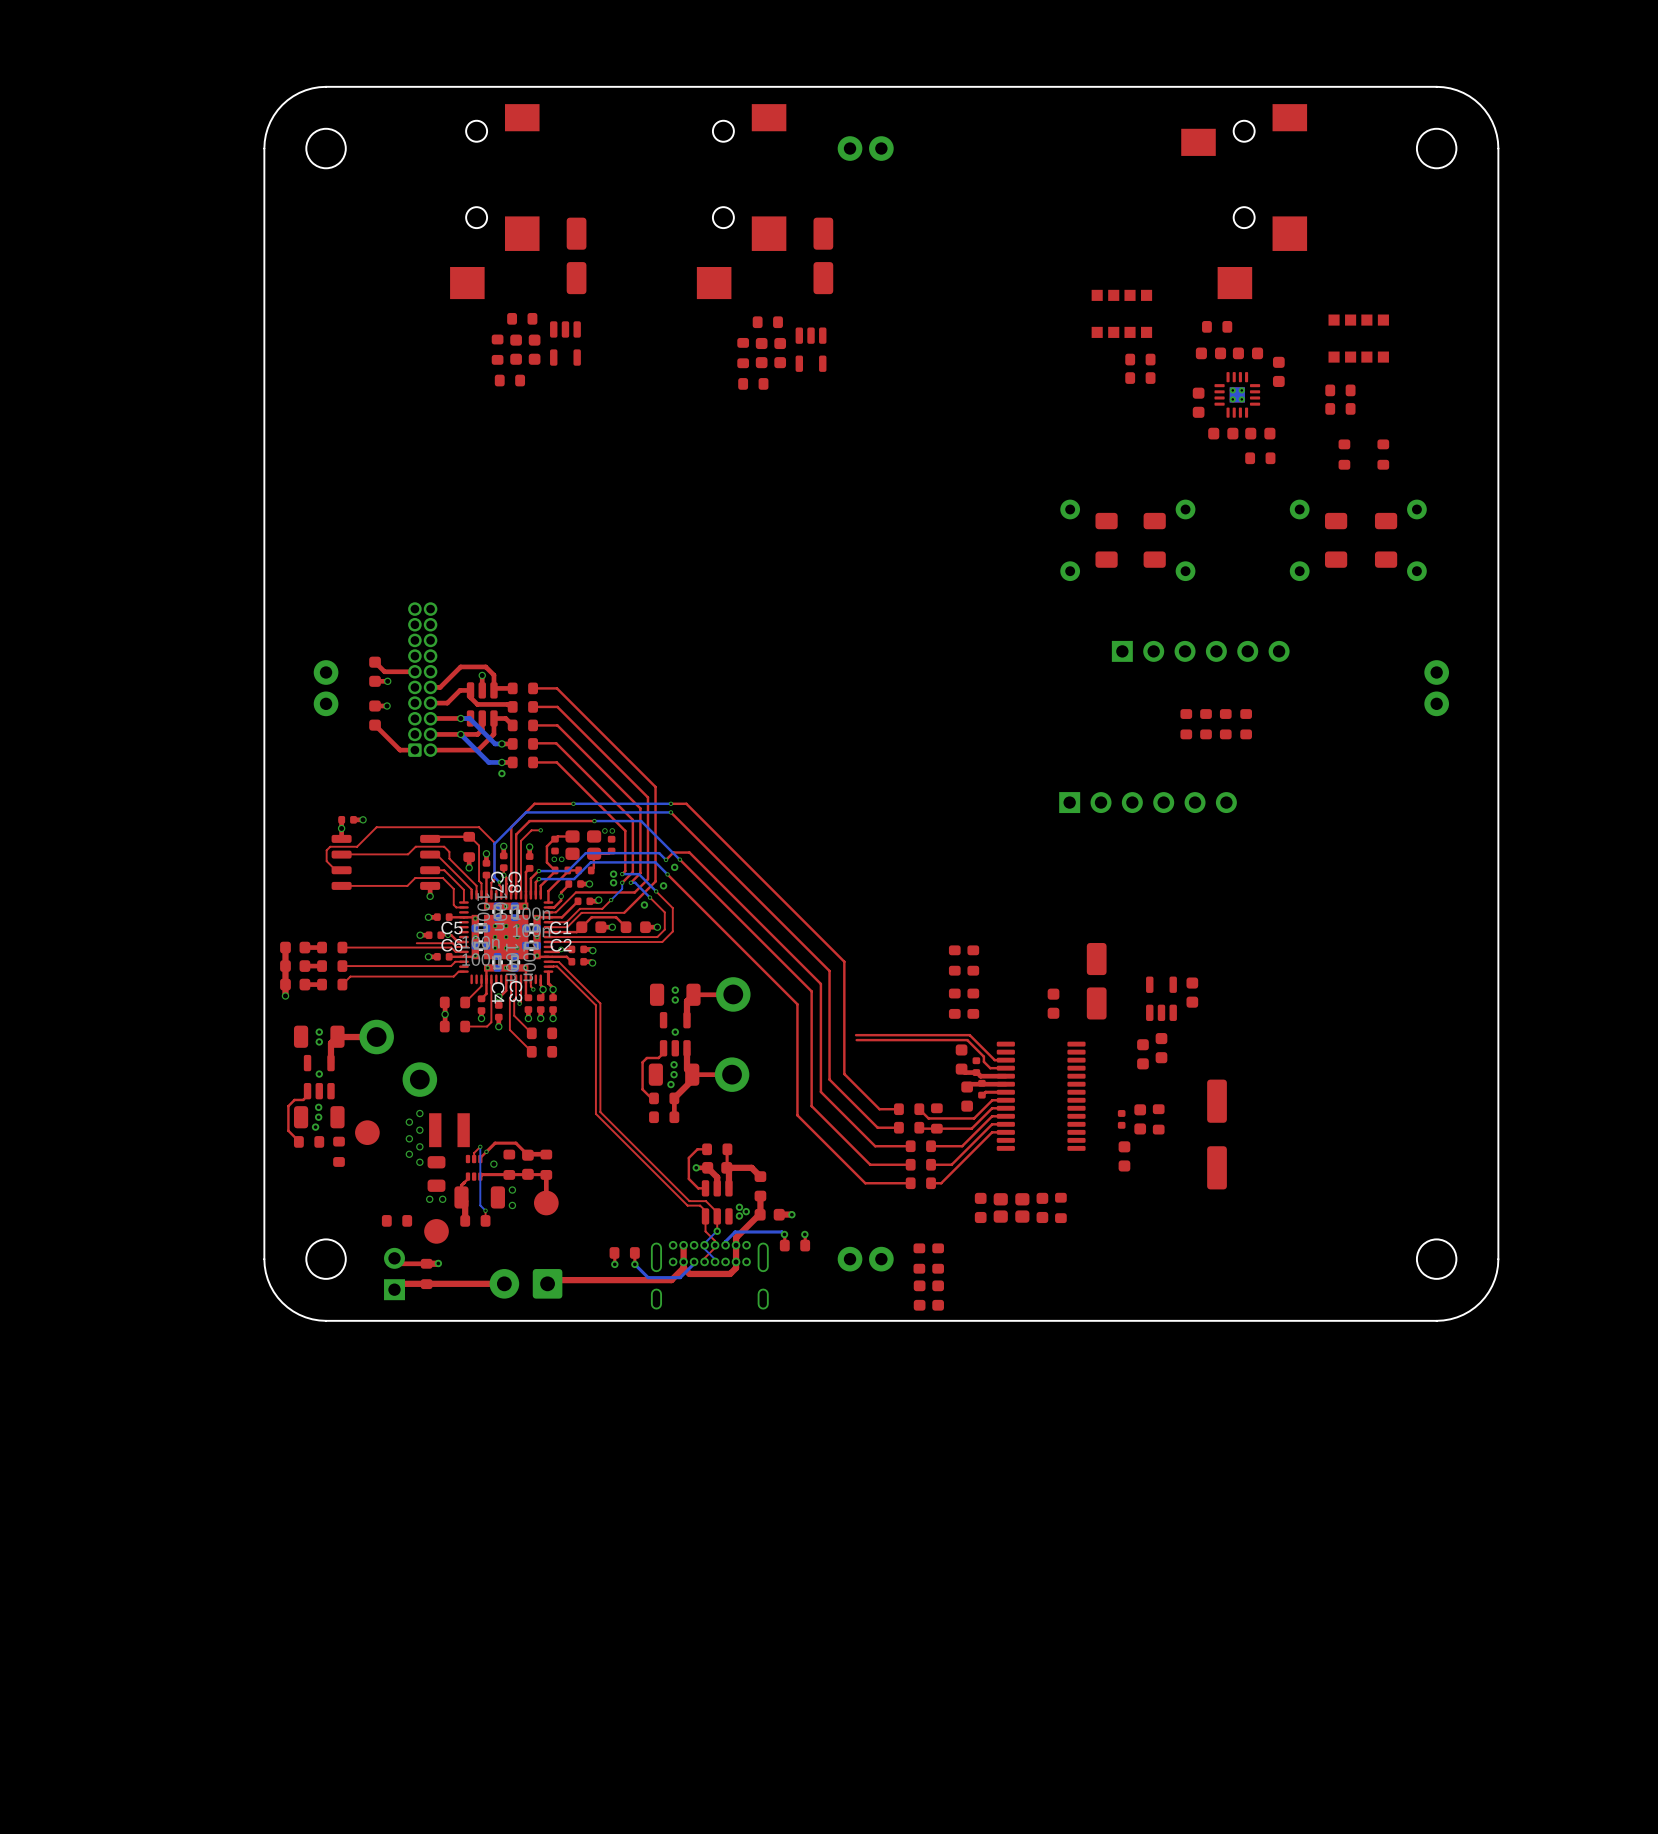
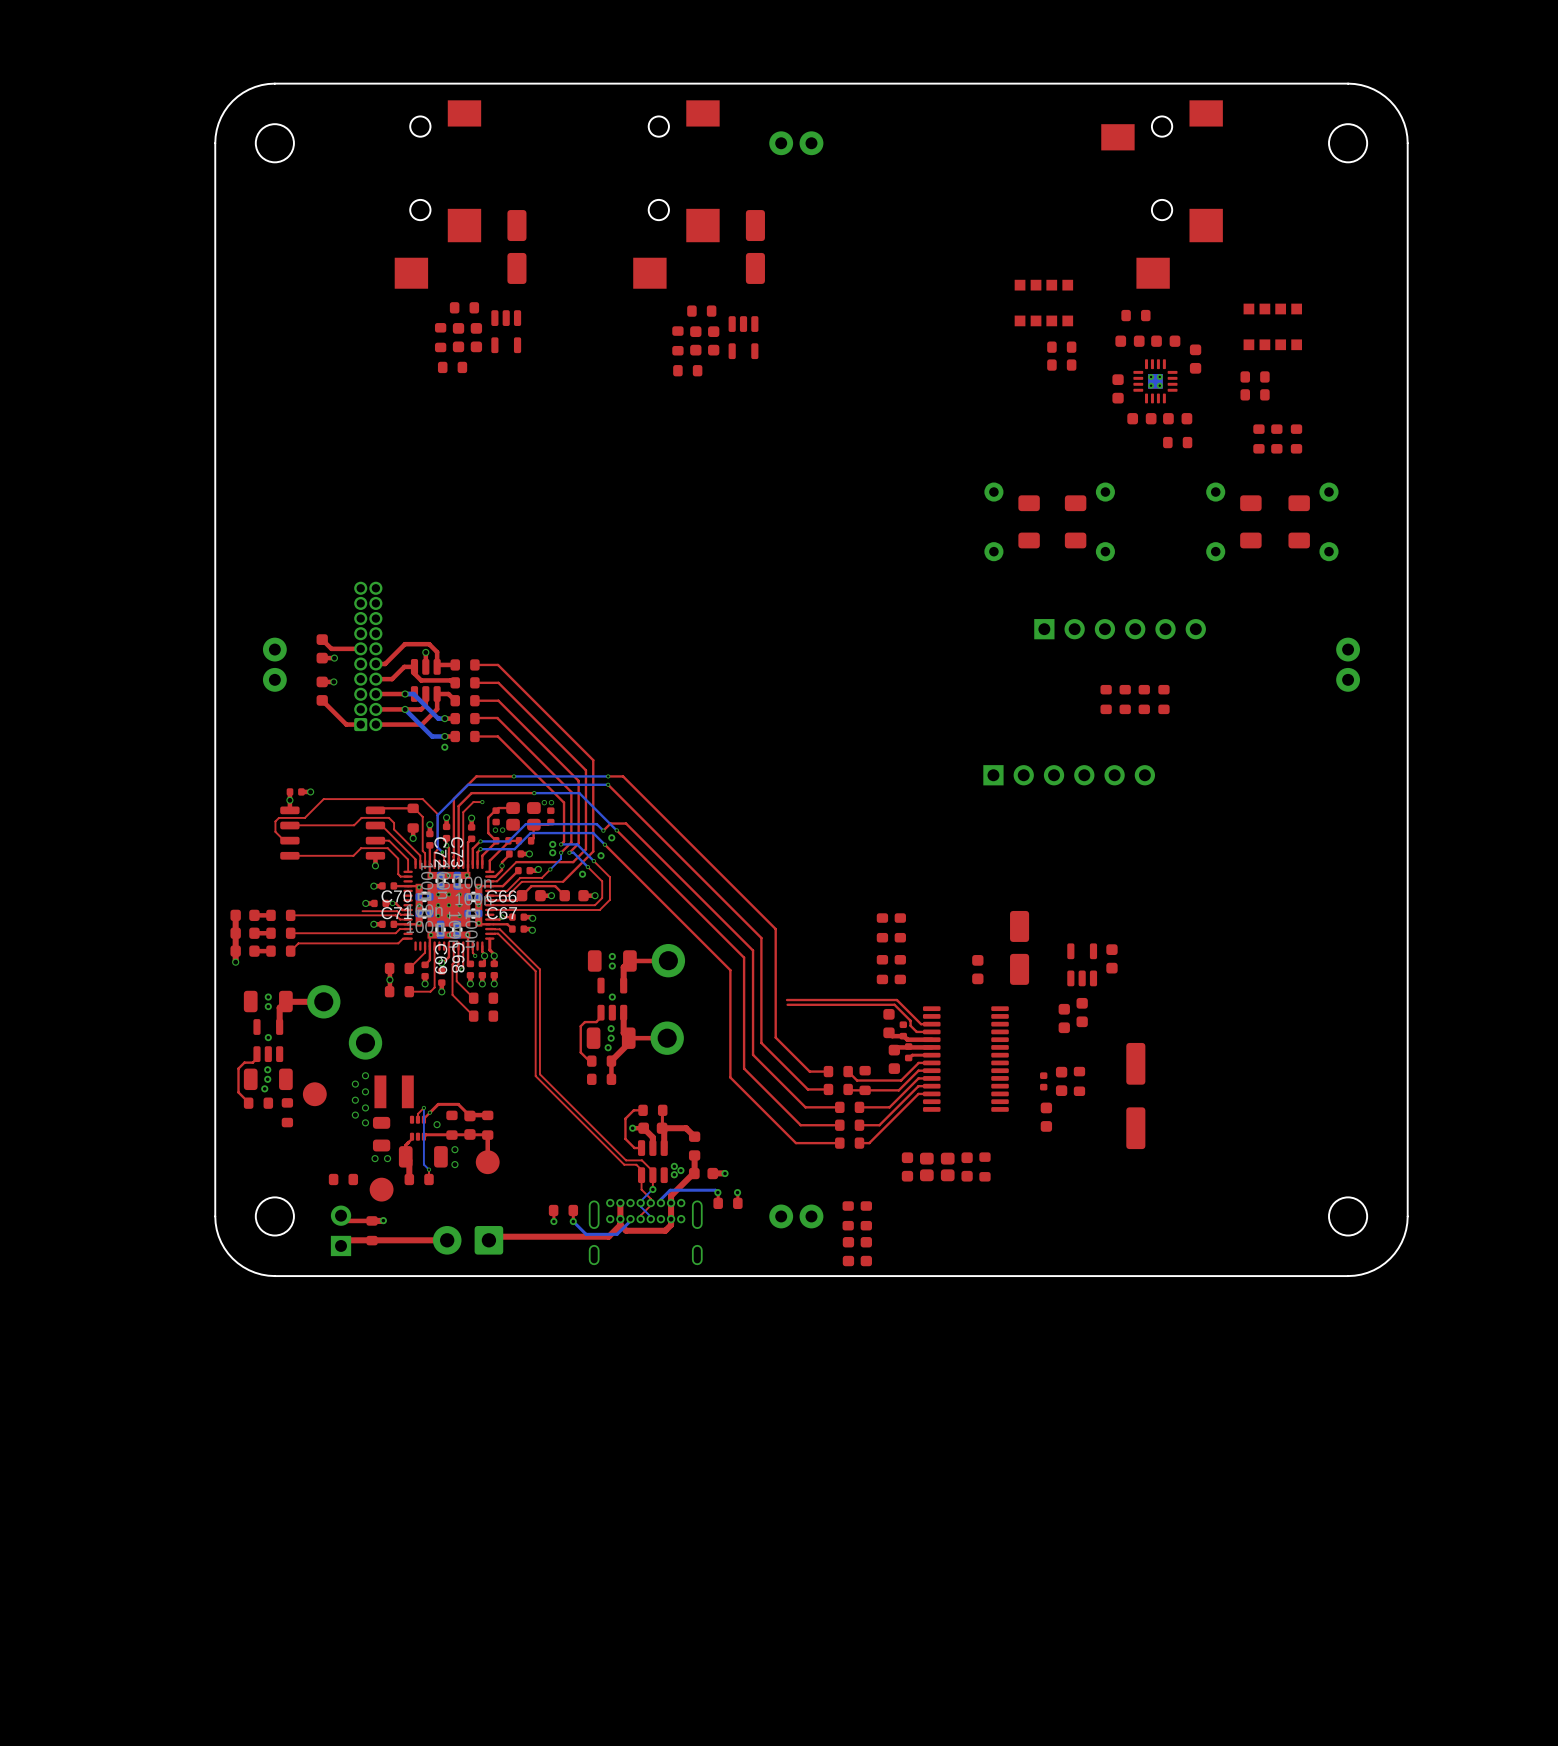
part: none -> (1276, 438)
C7 name: C7 (497, 882) -> C72 (440, 852)
C8 name: C8 (514, 882) -> C73 (457, 852)
C5 name: C5 (452, 927) -> C70 (396, 896)
C1 name: C1 (560, 927) -> C66 (501, 896)
C6 name: C6 (451, 945) -> C71 (396, 913)
C2 name: C2 (561, 945) -> C67 (502, 913)
C3 name: C3 (515, 991) -> C68 (458, 957)
C4 name: C4 (498, 992) -> C69 (441, 958)

